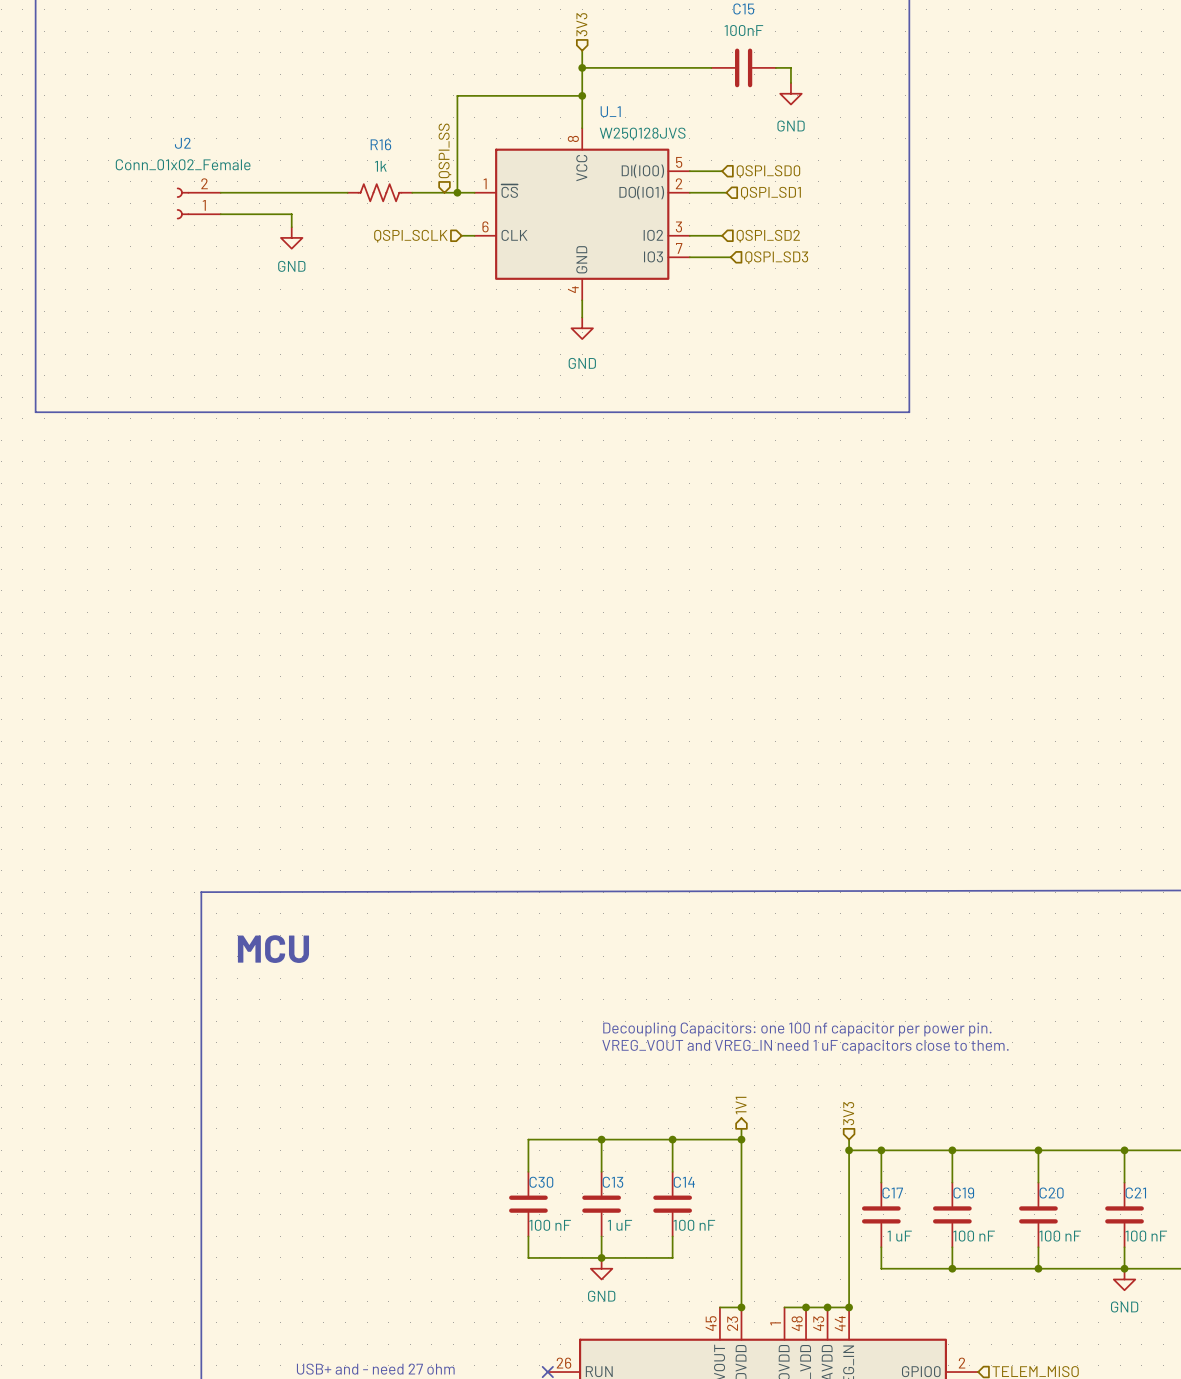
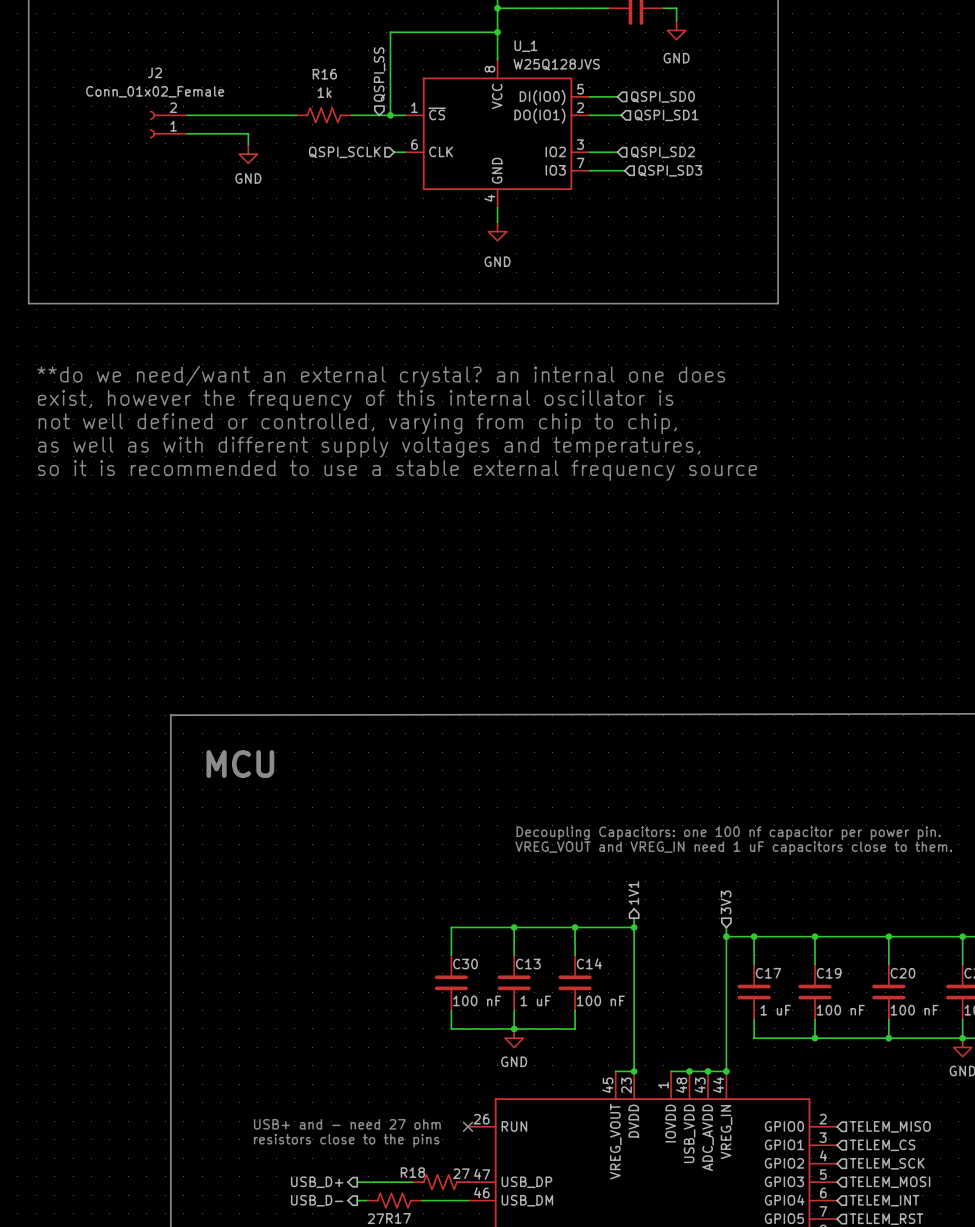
text: none -> **do we need/want an external crystal? an internal one does (381, 376)
text: none -> exist, however the frequency of this internal oscillator is (355, 400)
text: none -> not well defined or controlled, varying from chip to chip, (357, 423)
text: none -> as well as with different supply voltages and temperatures, (369, 447)
text: none -> so it is recommended to use a stable external frequency source (397, 470)

